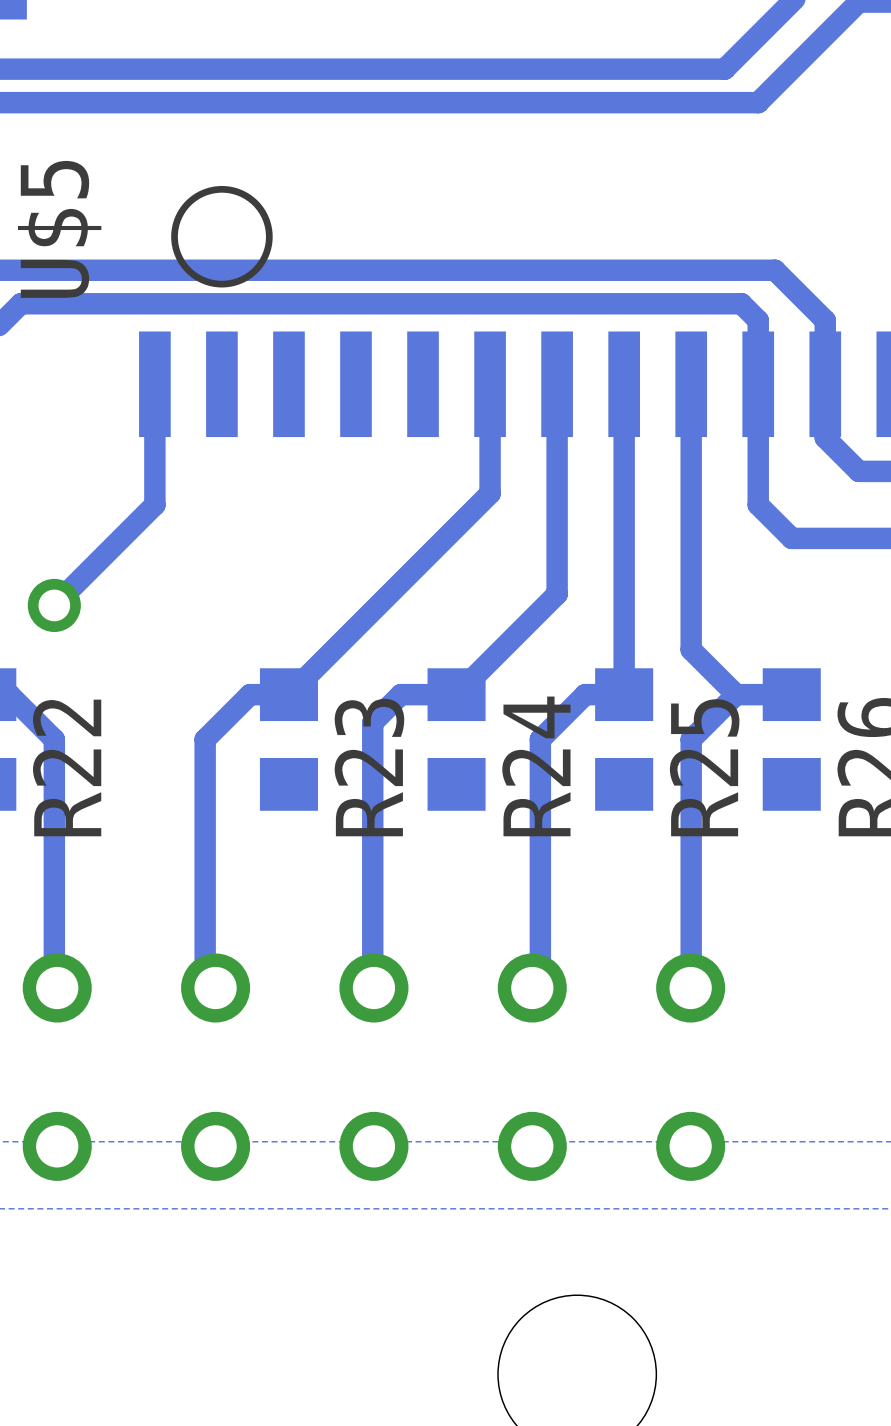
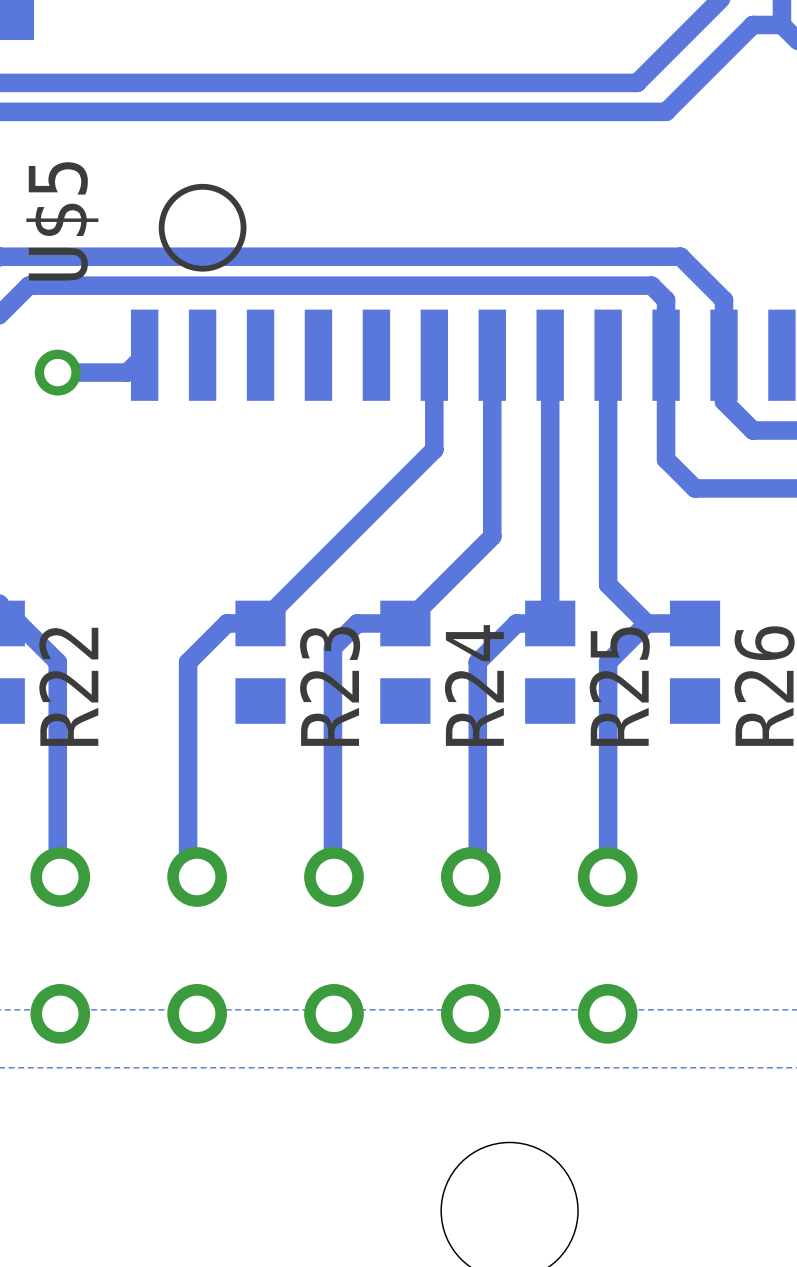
track: (154, 384) (154, 504) (54, 605) -> (144, 355) (127, 372) (57, 372)
via position: (54, 605) -> (57, 372)

